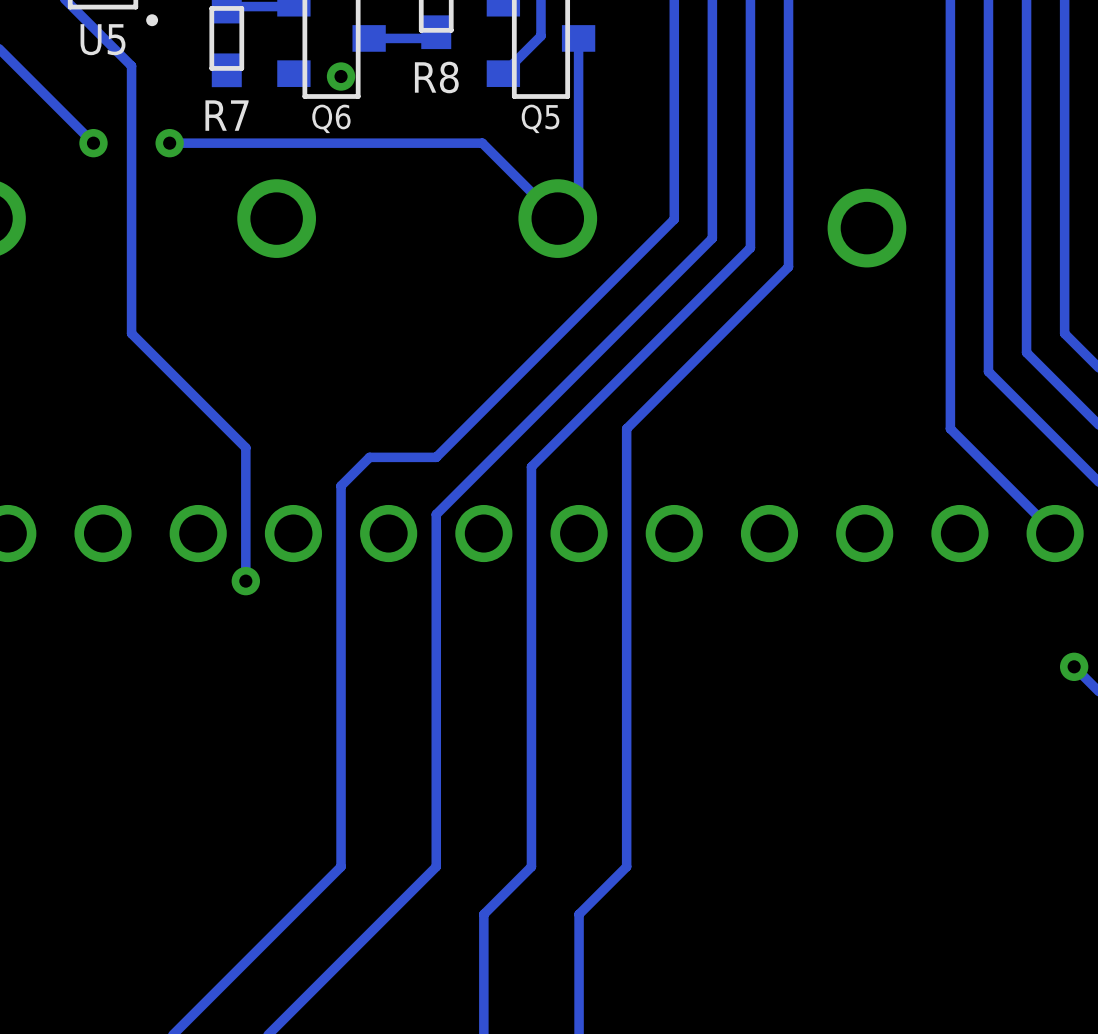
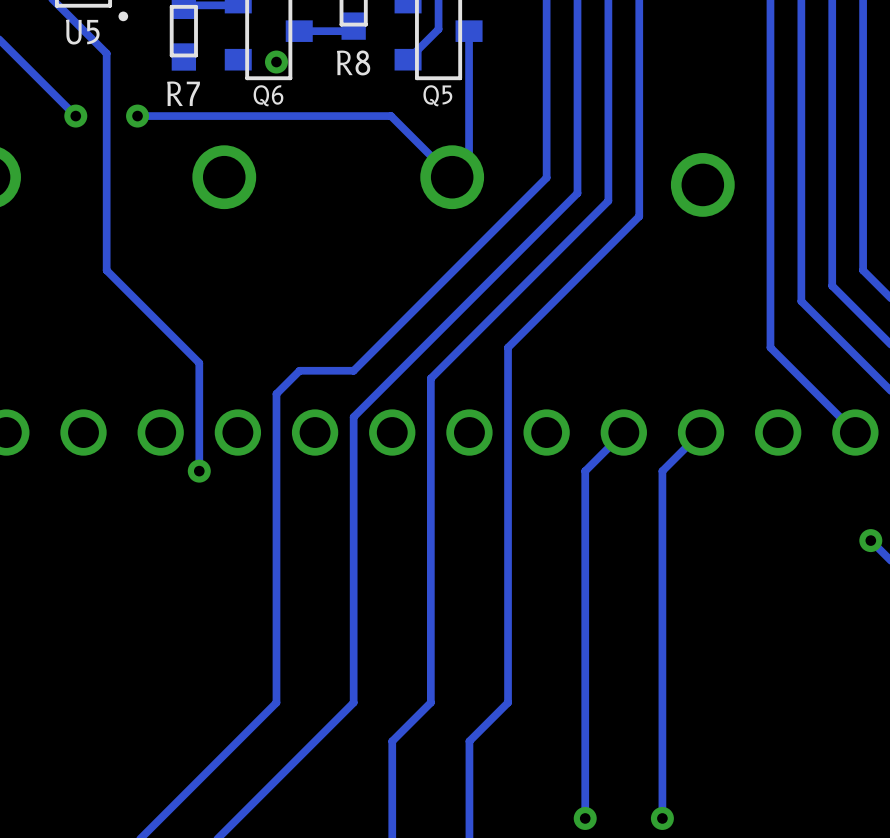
track: none -> (623, 432) (585, 471) (585, 818)
track: none -> (701, 432) (662, 471) (662, 818)
via: none -> (585, 818)
via: none -> (662, 818)

